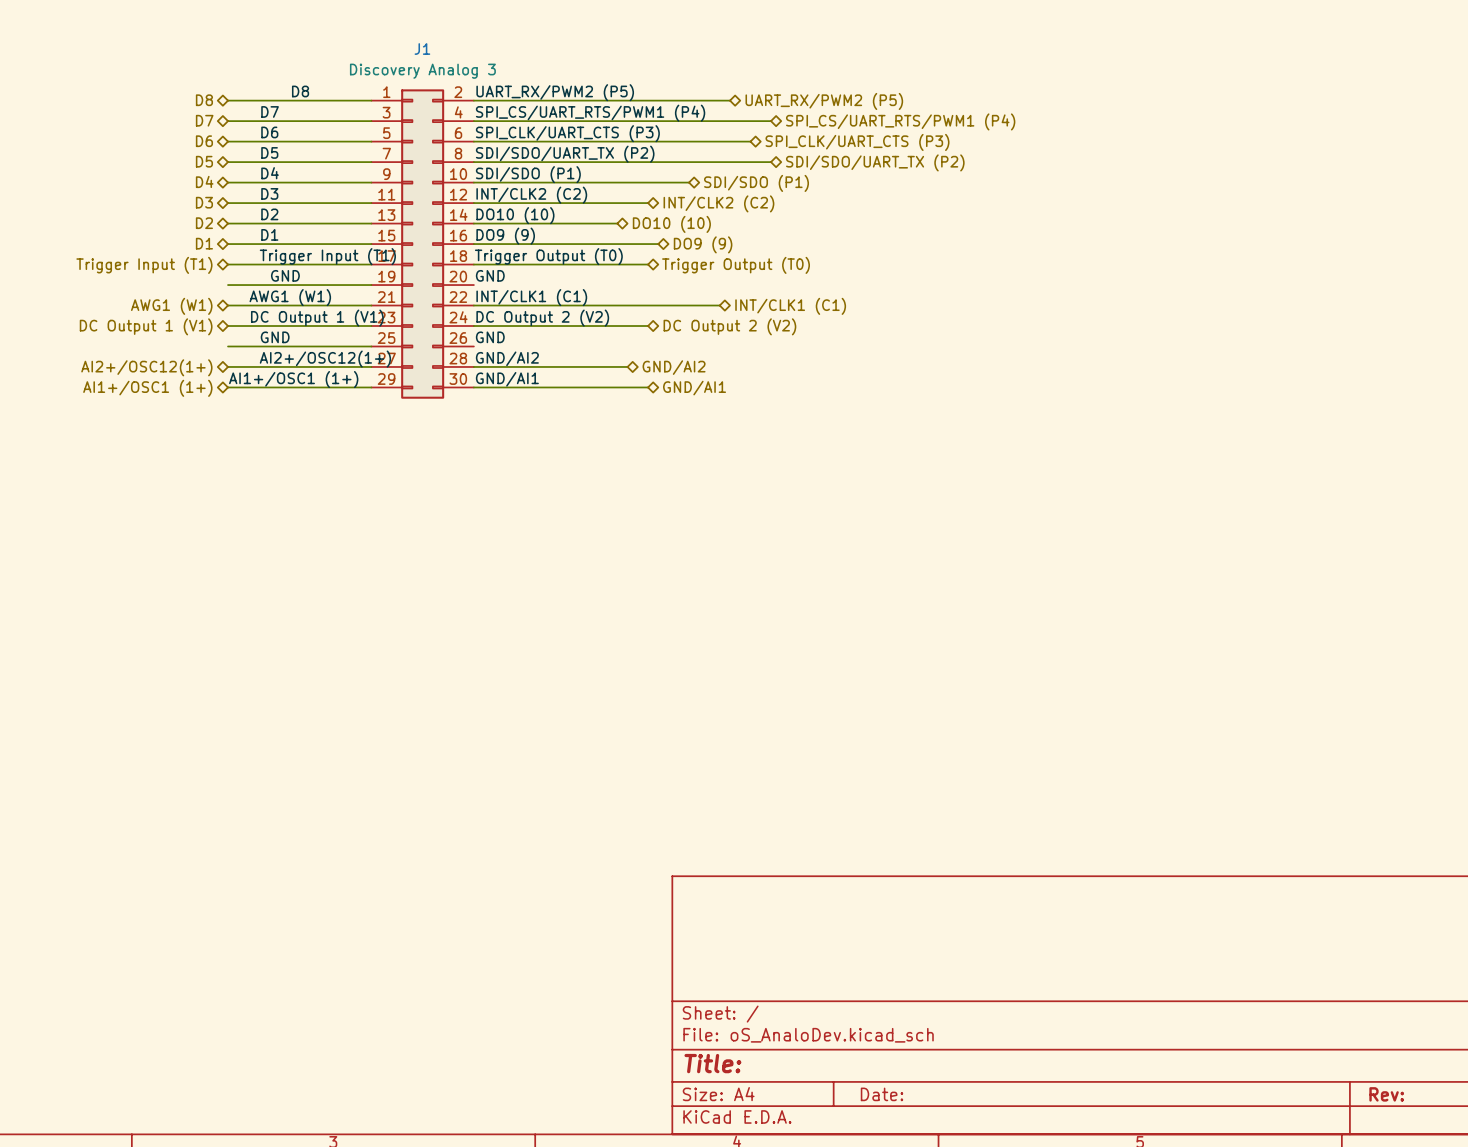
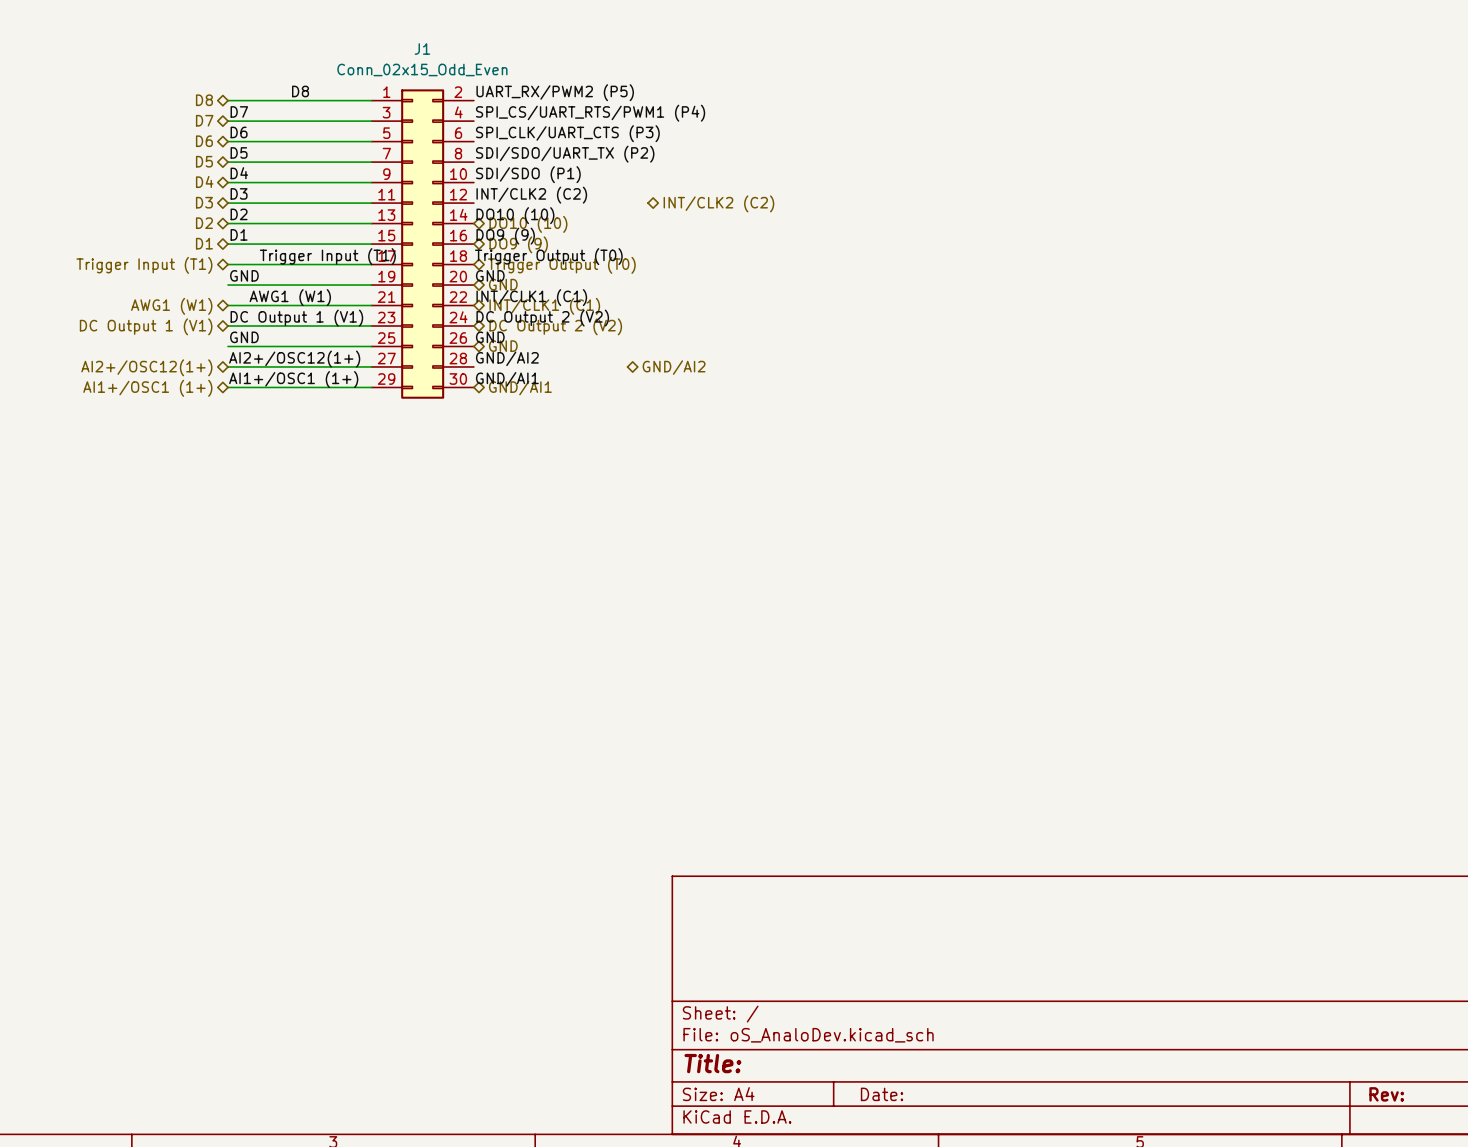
J1 value: Discovery Analog 3 (422, 71) -> Conn_02x15_Odd_Even (422, 69)
wire: (473, 100) (730, 100) -> none
hierarchical label: UART_RX/PWM2 (P5) (824, 101) -> none
label position: D7 (270, 111) -> D7 (239, 111)
wire: (473, 121) (770, 121) -> none
hierarchical label: SPI_CS/UART_RTS/PWM1 (P4) (900, 121) -> none
label position: D6 (269, 132) -> D6 (239, 132)
wire: (473, 141) (750, 141) -> none
hierarchical label: SPI_CLK/UART_CTS (P3) (857, 142) -> none
label position: D5 (269, 152) -> D5 (239, 152)
wire: (473, 162) (770, 162) -> none
hierarchical label: SDI/SDO/UART_TX (P2) (875, 162) -> none
label position: D4 (270, 173) -> D4 (239, 173)
wire: (473, 182) (689, 182) -> none
hierarchical label: SDI/SDO (P1) (756, 183) -> none
label position: D3 (269, 193) -> D3 (239, 193)
wire: (473, 203) (648, 203) -> none
label position: D2 (269, 214) -> D2 (239, 214)
wire: (473, 223) (617, 223) -> none
hierarchical label position: DO10 (10) (671, 224) -> DO10 (10) (528, 224)
label position: D1 (269, 234) -> D1 (239, 234)
wire: (473, 244) (658, 244) -> none
hierarchical label position: DO9 (9) (703, 244) -> DO9 (9) (518, 244)
wire: (473, 264) (648, 264) -> none
hierarchical label position: Trigger Output (T0) (736, 265) -> Trigger Output (T0) (561, 265)
label: none -> GND (244, 275)
label: GND (285, 275) -> none
hierarchical label: none -> GND (503, 284)
wire: (473, 305) (719, 305) -> none
hierarchical label: none -> INT/CLK1 (C1) (544, 306)
hierarchical label: INT/CLK1 (C1) (790, 306) -> none
label position: DC Output 1 (V1) (317, 318) -> DC Output 1 (V1) (296, 318)
wire: (473, 326) (648, 326) -> none
hierarchical label position: DC Output 2 (V2) (729, 326) -> DC Output 2 (V2) (555, 326)
label position: GND (275, 337) -> GND (244, 337)
hierarchical label: none -> GND (503, 346)
label position: AI2+/OSC12(1+) (325, 359) -> AI2+/OSC12(1+) (294, 359)
wire: (473, 366) (627, 366) -> none
wire: (473, 387) (648, 387) -> none
hierarchical label position: GND/AI1 (694, 388) -> GND/AI1 (520, 388)

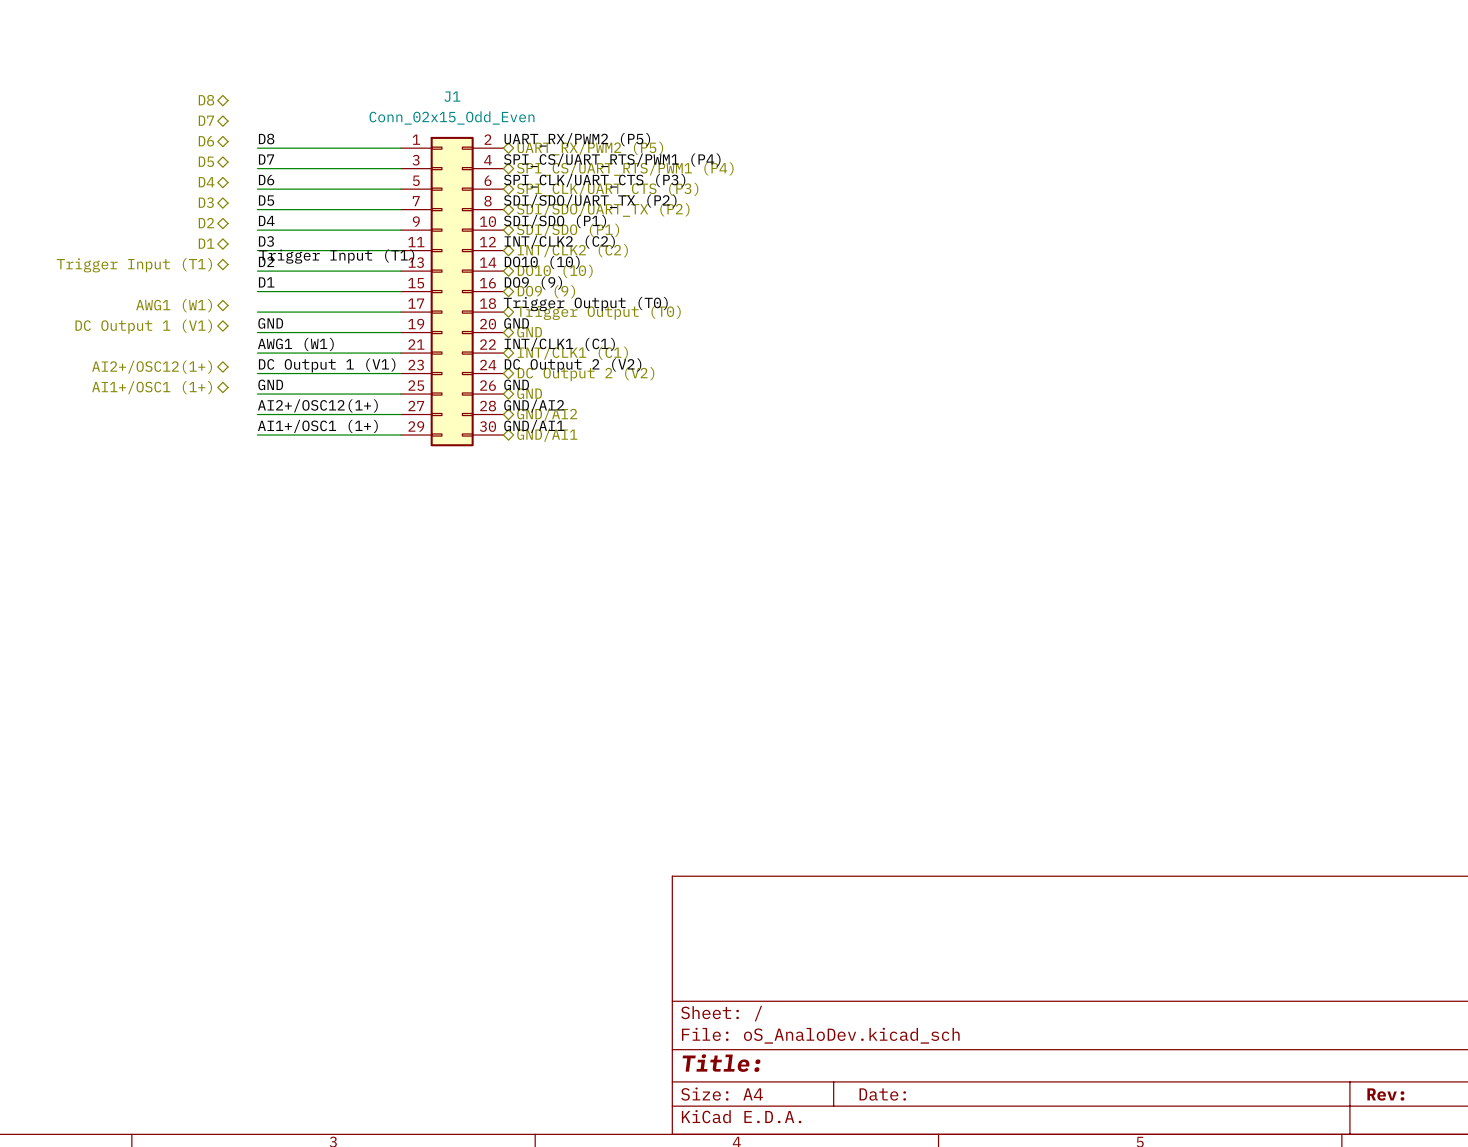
label position: D8 (300, 91) -> D8 (266, 139)
label position: UART_RX/PWM2 (P5) (555, 92) -> UART_RX/PWM2 (P5) (577, 139)
wire: (228, 100) (371, 100) -> (257, 148) (400, 148)
label position: D7 (239, 111) -> D7 (266, 159)
label position: SPI_CS/UART_RTS/PWM1 (P4) (590, 113) -> SPI_CS/UART_RTS/PWM1 (P4) (612, 160)
wire: (228, 121) (371, 121) -> (257, 168) (400, 168)
label position: D6 (239, 132) -> D6 (266, 180)
label position: SPI_CLK/UART_CTS (P3) (567, 133) -> SPI_CLK/UART_CTS (P3) (594, 180)
wire: (228, 141) (371, 141) -> (257, 189) (400, 189)
hierarchical label: none -> UART_RX/PWM2 (P5) (590, 148)
label position: D5 (239, 152) -> D5 (266, 200)
label position: SDI/SDO/UART_TX (P2) (565, 154) -> SDI/SDO/UART_TX (P2) (590, 201)
wire: (228, 162) (371, 162) -> (257, 209) (400, 209)
hierarchical label: none -> SPI_CS/UART_RTS/PWM1 (P4) (625, 169)
label position: D4 (239, 173) -> D4 (266, 220)
label position: SDI/SDO (P1) (528, 174) -> SDI/SDO (P1) (555, 221)
wire: (228, 182) (371, 182) -> (257, 230) (400, 230)
hierarchical label: none -> SPI_CLK/UART_CTS (P3) (607, 189)
label position: D3 (239, 193) -> D3 (266, 241)
label position: INT/CLK2 (C2) (531, 195) -> INT/CLK2 (C2) (559, 242)
wire: (228, 203) (371, 203) -> (257, 250) (400, 250)
hierarchical label position: INT/CLK2 (C2) (718, 203) -> INT/CLK2 (C2) (572, 250)
hierarchical label: none -> SDI/SDO/UART_TX (P2) (603, 210)
label position: D2 (239, 214) -> D2 (266, 261)
label position: DO10 (10) (515, 215) -> DO10 (10) (542, 262)
wire: (228, 223) (371, 223) -> (257, 271) (400, 271)
hierarchical label position: DO10 (10) (528, 224) -> DO10 (10) (555, 271)
hierarchical label: none -> SDI/SDO (P1) (568, 230)
label position: D1 (239, 234) -> D1 (266, 282)
label position: DO9 (9) (505, 236) -> DO9 (9) (533, 282)
wire: (228, 244) (371, 244) -> (257, 291) (400, 291)
J1 position: (422, 244) -> (452, 291)
hierarchical label position: DO9 (9) (518, 244) -> DO9 (9) (546, 291)
label position: Trigger Output (T0) (548, 256) -> Trigger Output (T0) (585, 304)
wire: (228, 264) (371, 264) -> (257, 312) (400, 312)
hierarchical label position: Trigger Output (T0) (561, 265) -> Trigger Output (T0) (598, 312)
label: GND (244, 275) -> none
label: GND (490, 275) -> none
hierarchical label: GND (503, 284) -> none
wire: (228, 285) (371, 285) -> (257, 332) (400, 332)
label position: AWG1 (W1) (290, 297) -> AWG1 (W1) (295, 344)
label position: INT/CLK1 (C1) (531, 297) -> INT/CLK1 (C1) (559, 344)
wire: (228, 305) (371, 305) -> (257, 353) (400, 353)
hierarchical label position: INT/CLK1 (C1) (544, 306) -> INT/CLK1 (C1) (572, 353)
label position: DC Output 1 (V1) (296, 318) -> DC Output 1 (V1) (327, 365)
label position: DC Output 2 (V2) (542, 318) -> DC Output 2 (V2) (573, 365)
wire: (228, 326) (371, 326) -> (257, 373) (400, 373)
hierarchical label position: DC Output 2 (V2) (555, 326) -> DC Output 2 (V2) (586, 374)
label position: GND (244, 337) -> GND (270, 323)
label position: GND (490, 337) -> GND (516, 323)
wire: (228, 346) (371, 346) -> (257, 394) (400, 394)
hierarchical label position: GND (503, 346) -> GND (529, 332)
label position: GND/AI2 (507, 358) -> GND/AI2 (534, 405)
label position: AI2+/OSC12(1+) (294, 359) -> AI2+/OSC12(1+) (317, 405)
wire: (228, 366) (371, 366) -> (257, 414) (400, 414)
hierarchical label position: GND/AI2 (674, 367) -> GND/AI2 (547, 414)
label position: AI1+/OSC1 (1+) (293, 379) -> AI1+/OSC1 (1+) (317, 426)
label position: GND/AI1 (507, 379) -> GND/AI1 (534, 426)
label: none -> GND (270, 384)
label: none -> GND (516, 384)
wire: (228, 387) (371, 387) -> (257, 435) (400, 435)
hierarchical label position: GND/AI1 (520, 388) -> GND/AI1 (547, 435)
hierarchical label: none -> GND (529, 393)

